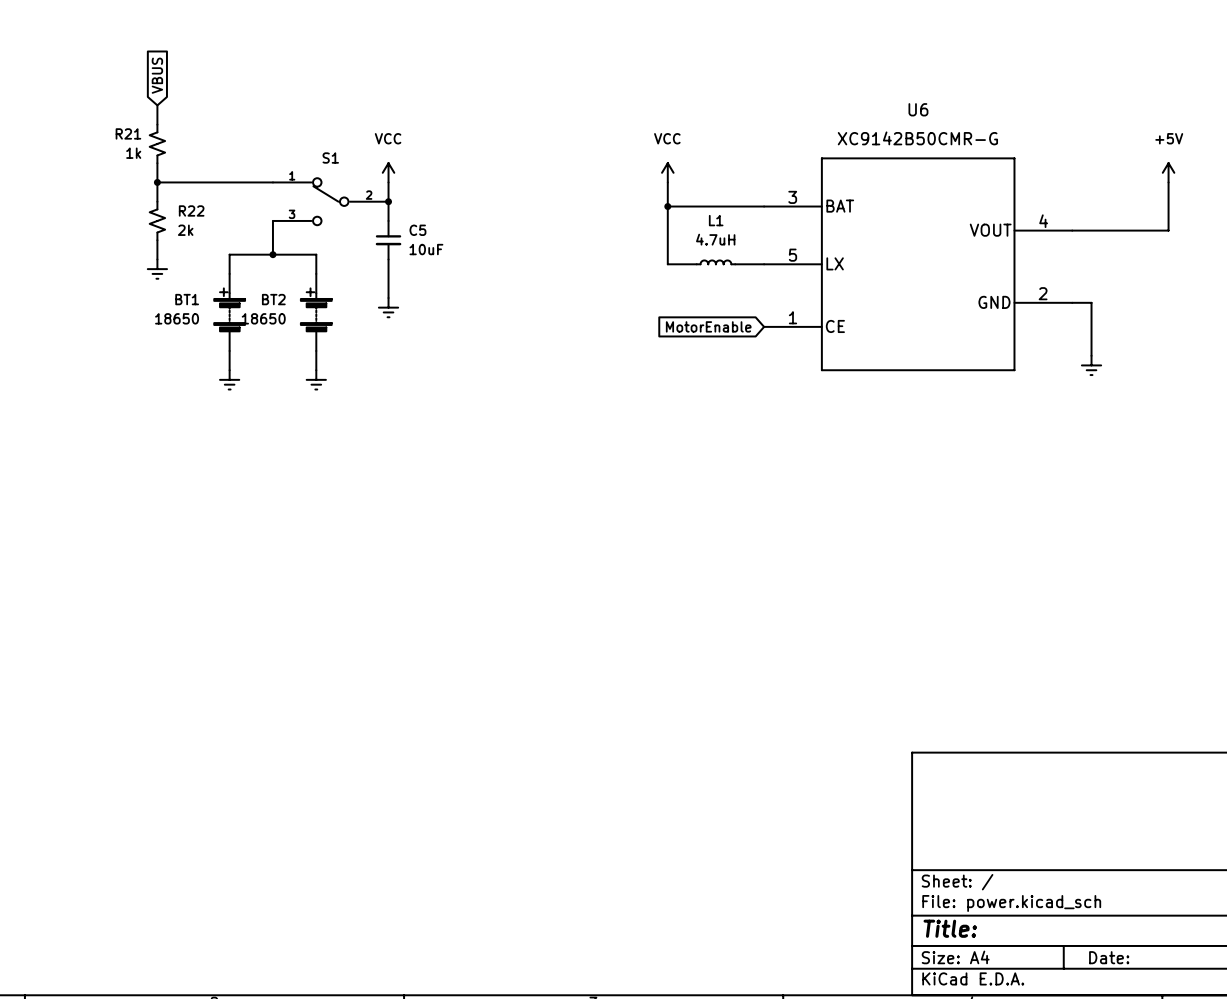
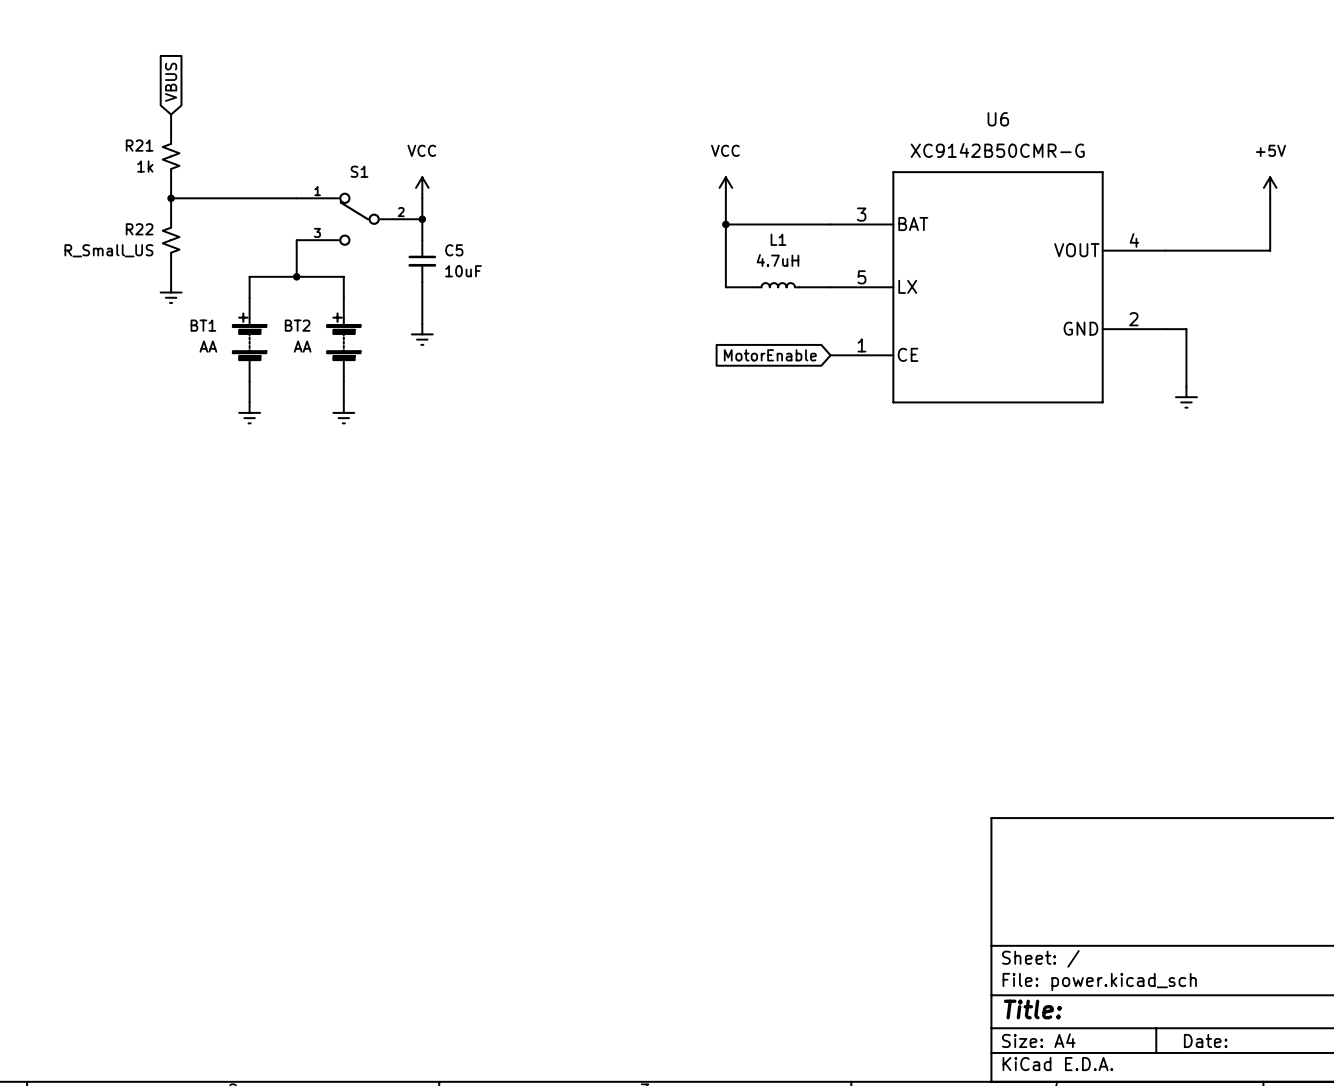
R22 name position: R22 (191, 210) -> R22 (139, 229)
R22 value: 2k (185, 230) -> R_Small_US (108, 250)
BT1 value: 18650 (177, 318) -> AA (208, 346)
BT2 value: 18650 (263, 318) -> AA (302, 346)

